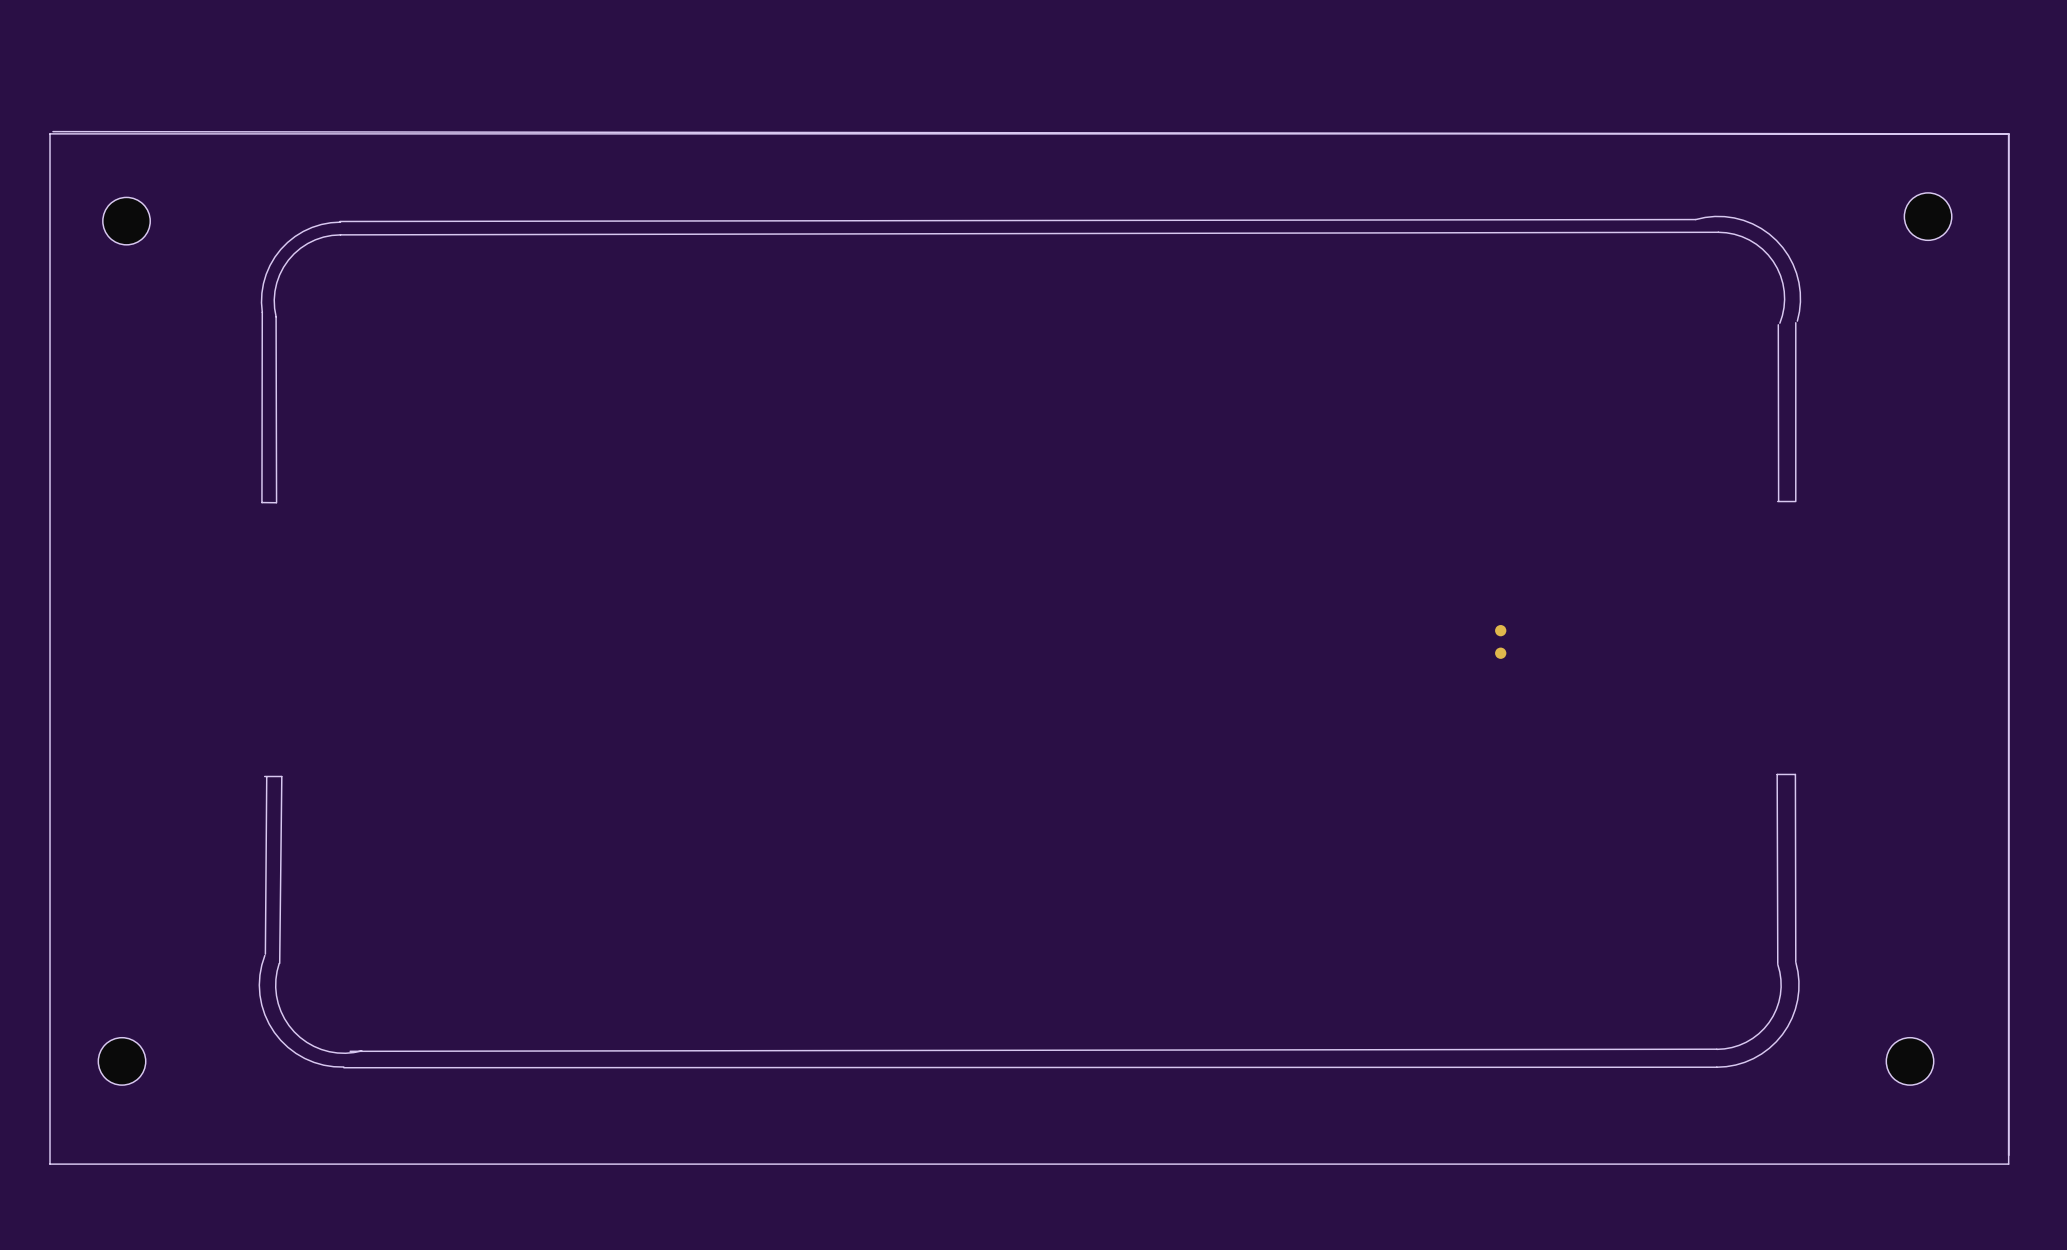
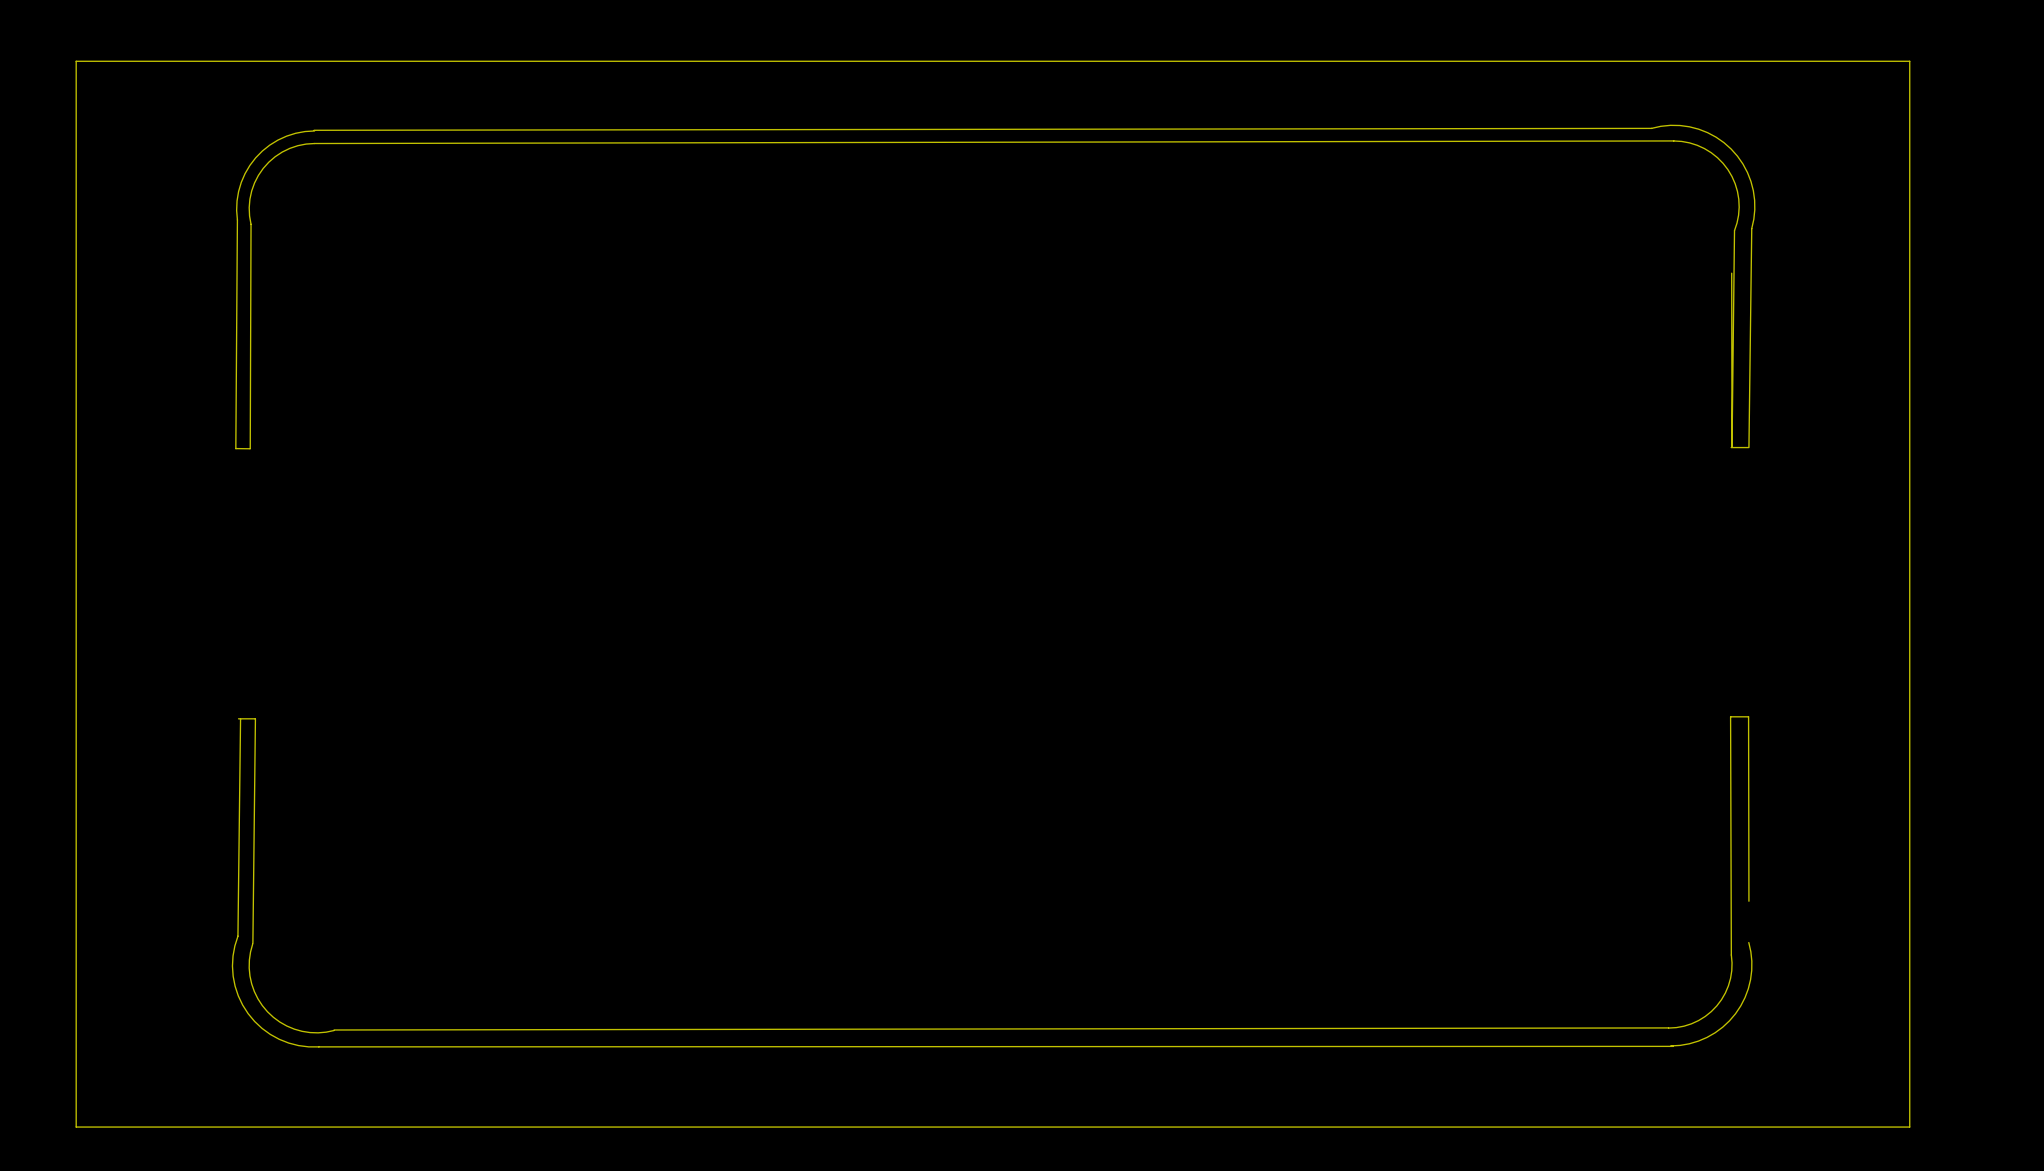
board edge: (52, 131) (2008, 133) -> none
board edge: (2008, 133) (50, 133) (50, 1164) (2008, 1164) (2008, 133) -> (1909, 61) (1909, 1127) (76, 1127) (76, 61) (1909, 61)
part: (1928, 216) -> none
part: (126, 221) -> none
board edge: (339, 221) (1695, 219) (1724, 216) (1743, 220) (1761, 228) (1776, 240) (1788, 255) (1798, 282) (1800, 302) (1797, 321) -> none
board edge: (340, 222) (312, 227) (287, 242) (274, 257) (263, 283) (261, 302) (261, 502) -> (314, 130) (295, 133) (269, 145) (249, 165) (238, 191) (236, 210) (235, 448)
board edge: (1795, 322) (1795, 501) -> (314, 130) (1651, 128) (1670, 125) (1689, 126) (1707, 132) (1731, 149) (1742, 164) (1753, 190) (1754, 209) (1751, 228) (1748, 447)
board edge: (1779, 323) (1784, 307) (1784, 291) (1780, 275) (1773, 261) (1762, 249) (1749, 240) (1734, 234) (1718, 232) (331, 235) (315, 239) (294, 253) (283, 267) (274, 291) (276, 502) -> (1732, 447) (1734, 230) (1738, 215) (1737, 191) (1727, 169) (1711, 152) (1689, 142) (1673, 140) (314, 143) (297, 145) (275, 156) (263, 168) (254, 182) (249, 199) (250, 448)
part: (1500, 641) -> none
board edge: (266, 776) (265, 954) -> (240, 719) (237, 936) (233, 955) (233, 976) (242, 1005) (254, 1021) (270, 1034) (298, 1045) (1673, 1046)
board edge: (264, 955) (259, 975) (259, 995) (264, 1014) (274, 1032) (287, 1047) (304, 1058) (323, 1065) (343, 1067) -> none
board edge: (1795, 962) (1798, 981) (1797, 1000) (1792, 1018) (1782, 1034) (1769, 1048) (1753, 1058) (1726, 1066) (343, 1067) -> none
board edge: (279, 963) (275, 979) (276, 995) (280, 1011) (294, 1031) (306, 1042) (321, 1049) (337, 1052) (361, 1050) -> (253, 903) (252, 943)
board edge: none -> (1731, 903) (1731, 970) (1725, 992) (1711, 1011) (1698, 1020) (1684, 1026) (1668, 1028)
board edge: (1777, 964) (1780, 979) (1780, 994) (1776, 1009) (1769, 1022) (1758, 1033) (1746, 1042) (1731, 1047) (1716, 1049) -> none
board edge: none -> (1748, 942) (1751, 961) (1750, 979) (1745, 997) (1735, 1013) (1722, 1027) (1707, 1037) (1689, 1043) (1670, 1045)
board edge: none -> (252, 944) (249, 968) (251, 983) (257, 998) (267, 1011) (279, 1022) (294, 1029) (310, 1032) (334, 1030)
board edge: (1716, 1049) (350, 1051) -> none
part: (122, 1061) -> none
part: (1910, 1061) -> none
board edge: none -> (1668, 1027) (334, 1030)

